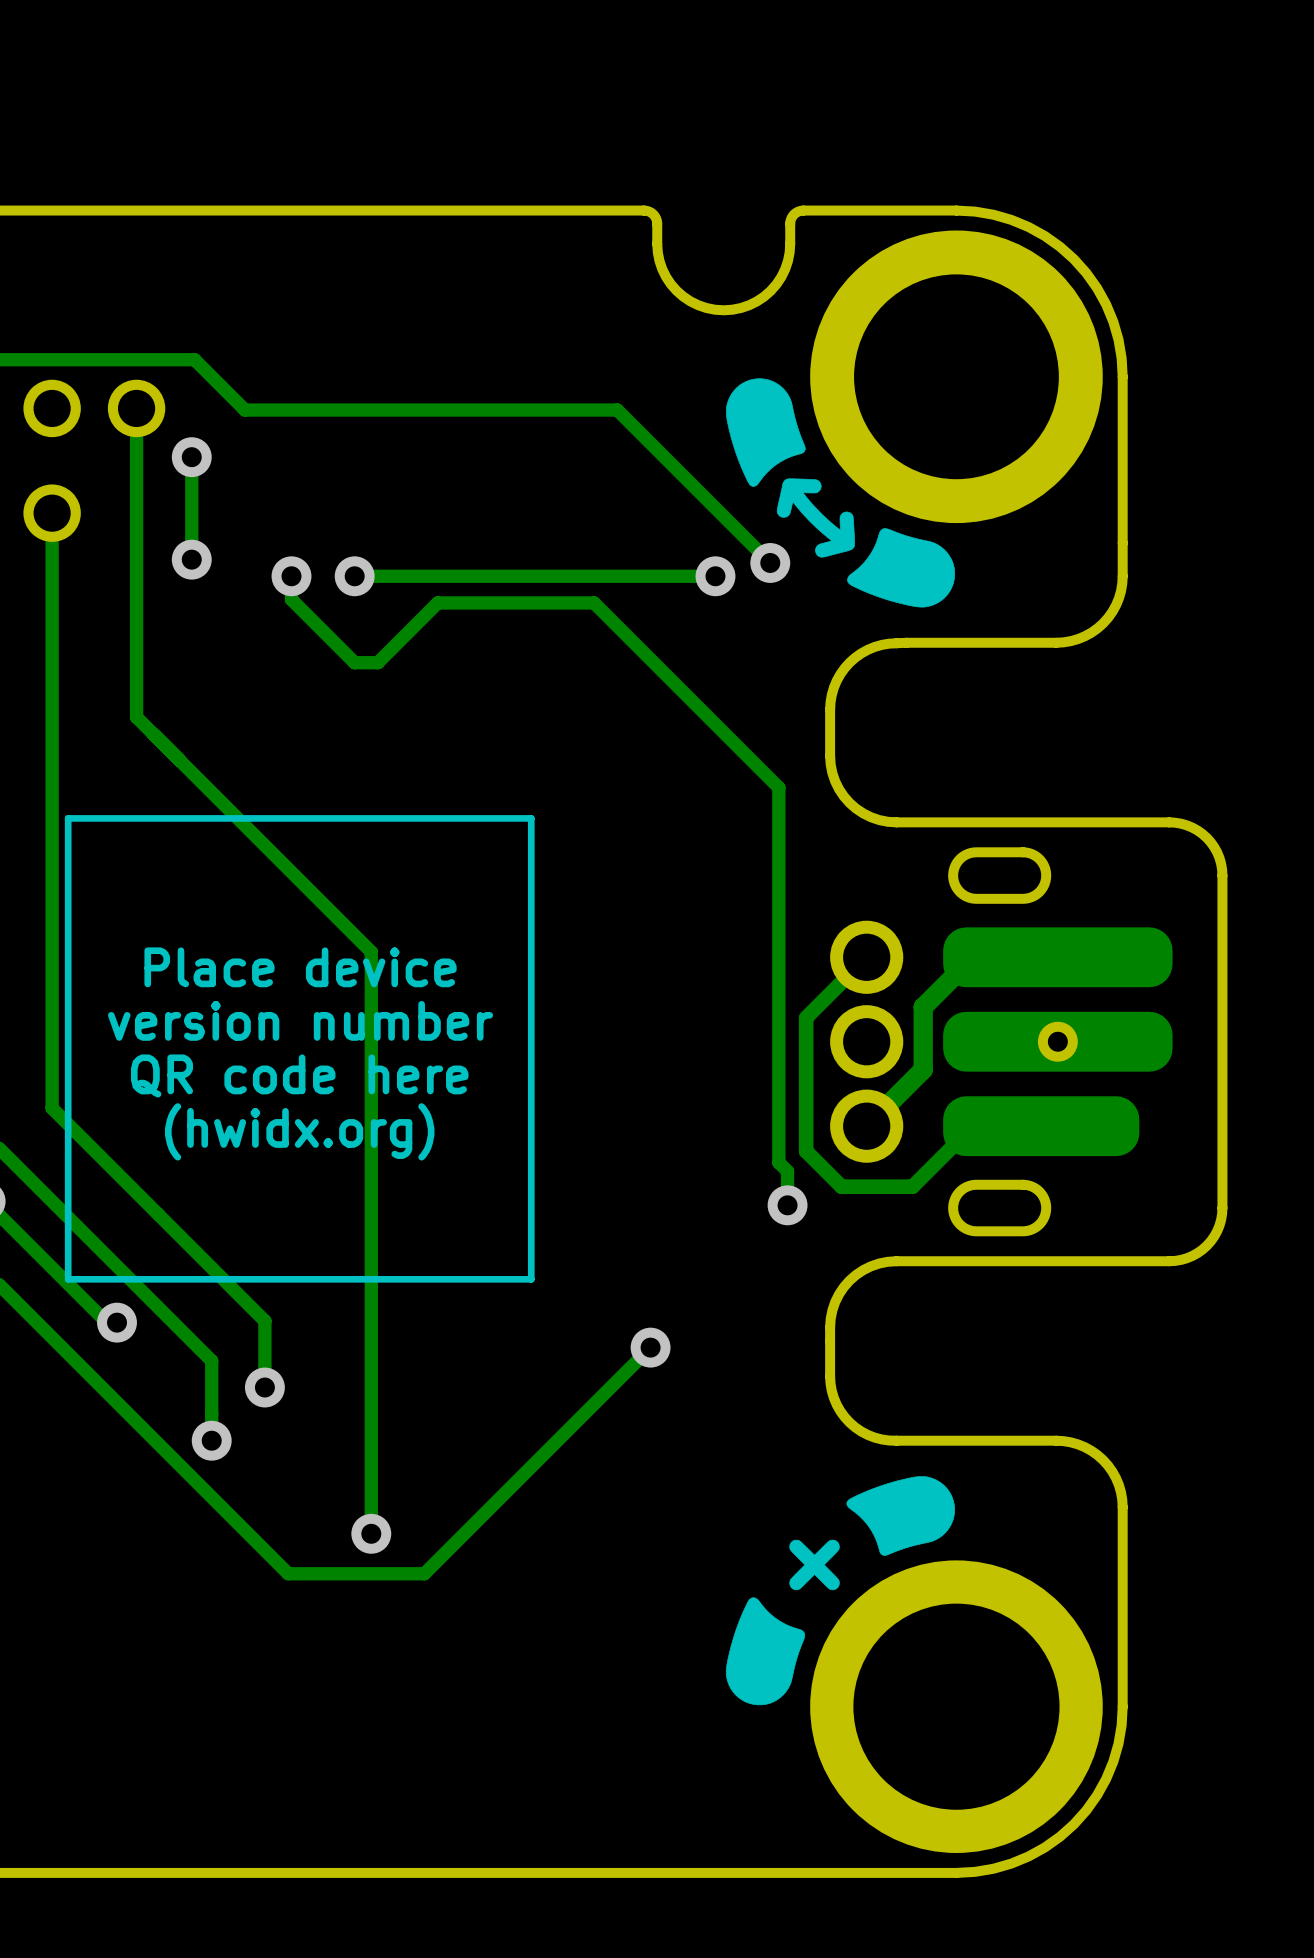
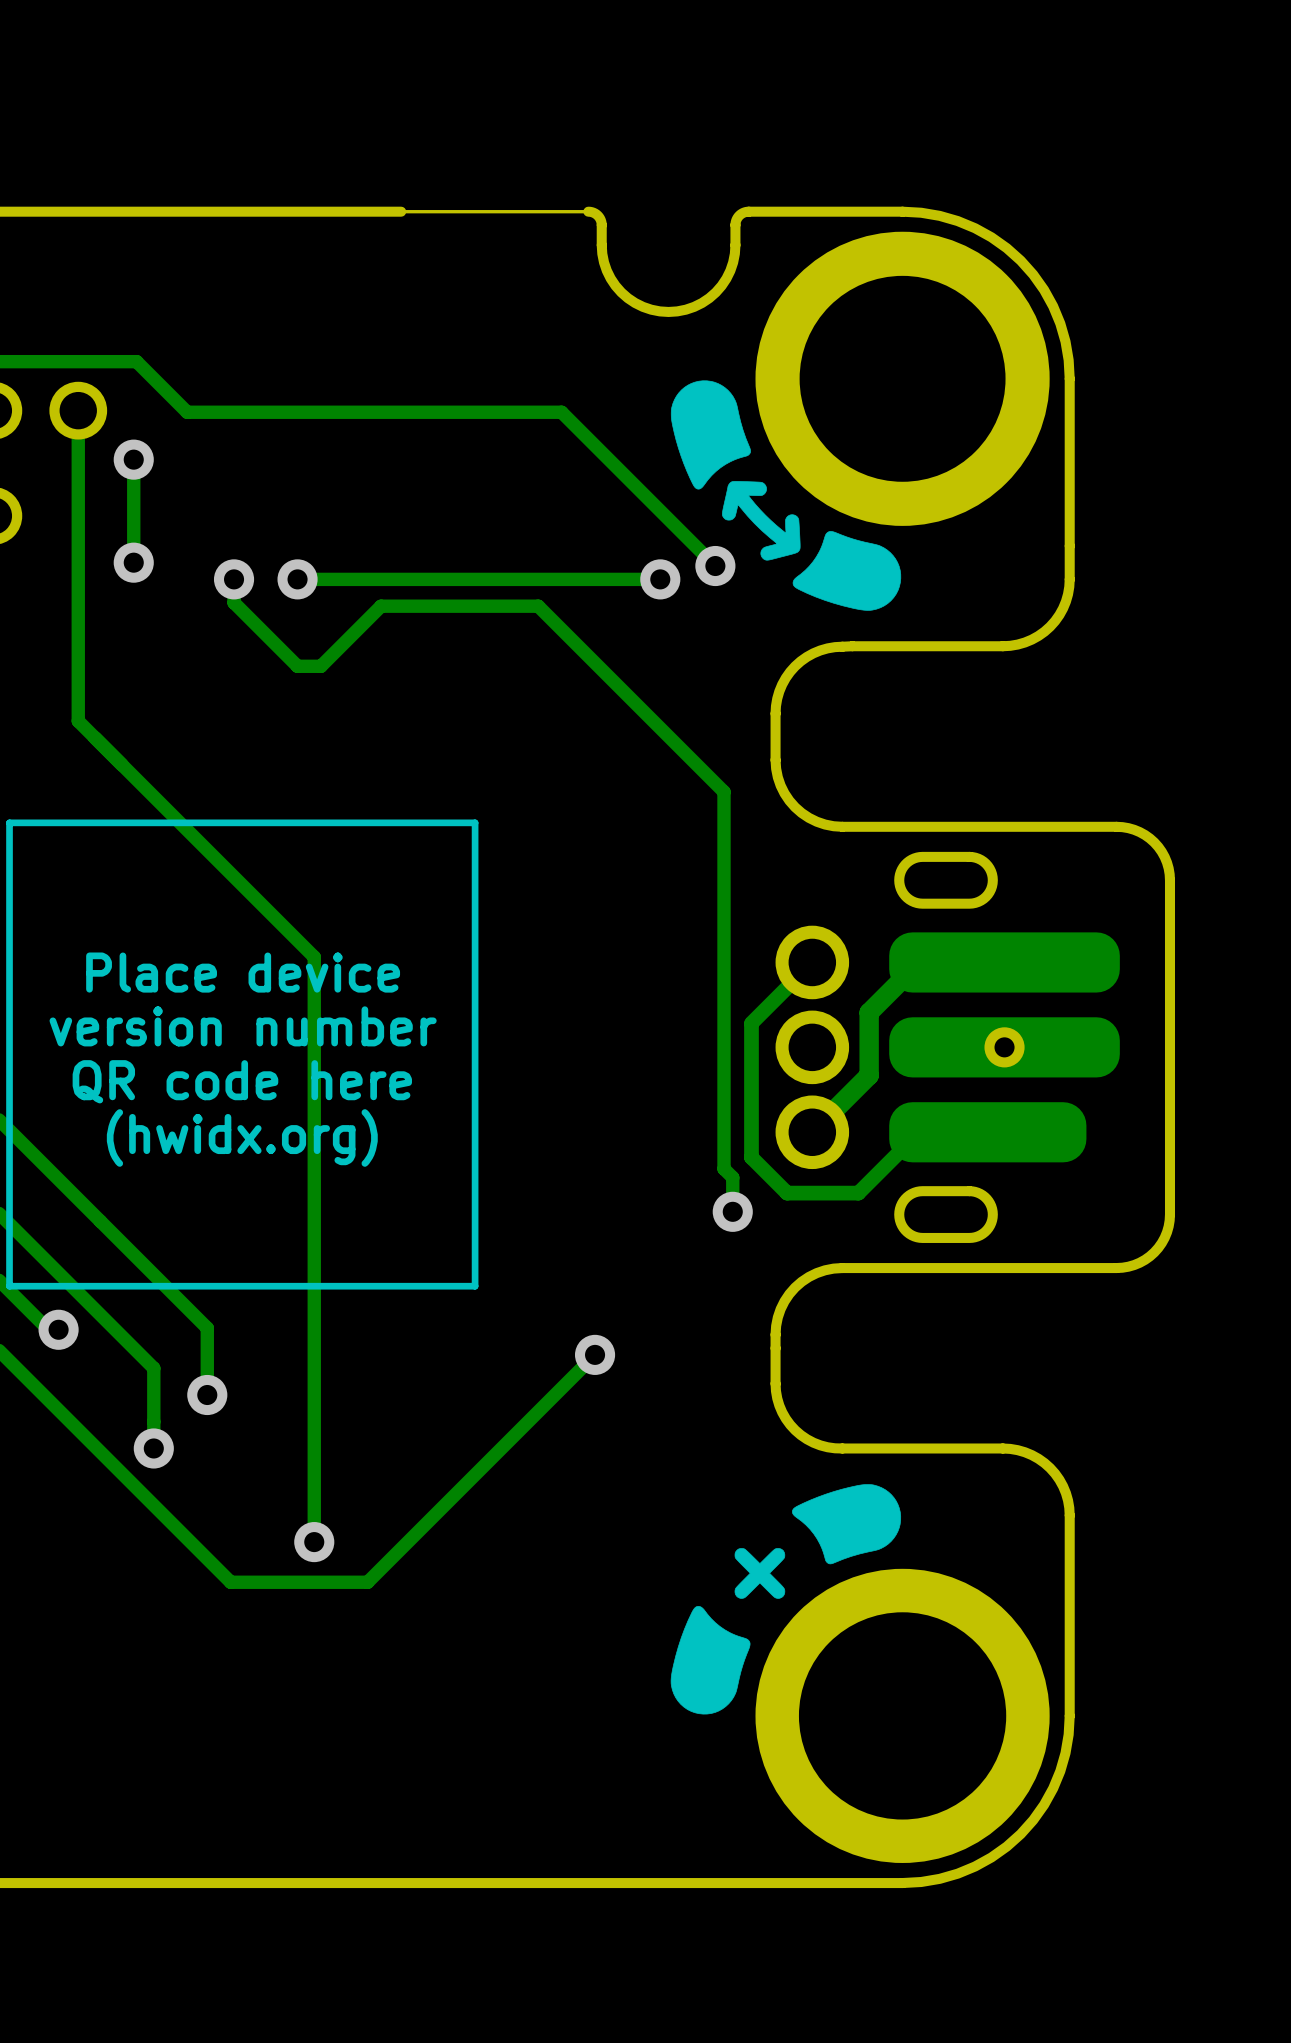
board edge width: thick (643, 210) (457, 210) -> thin (588, 211) (401, 211)

